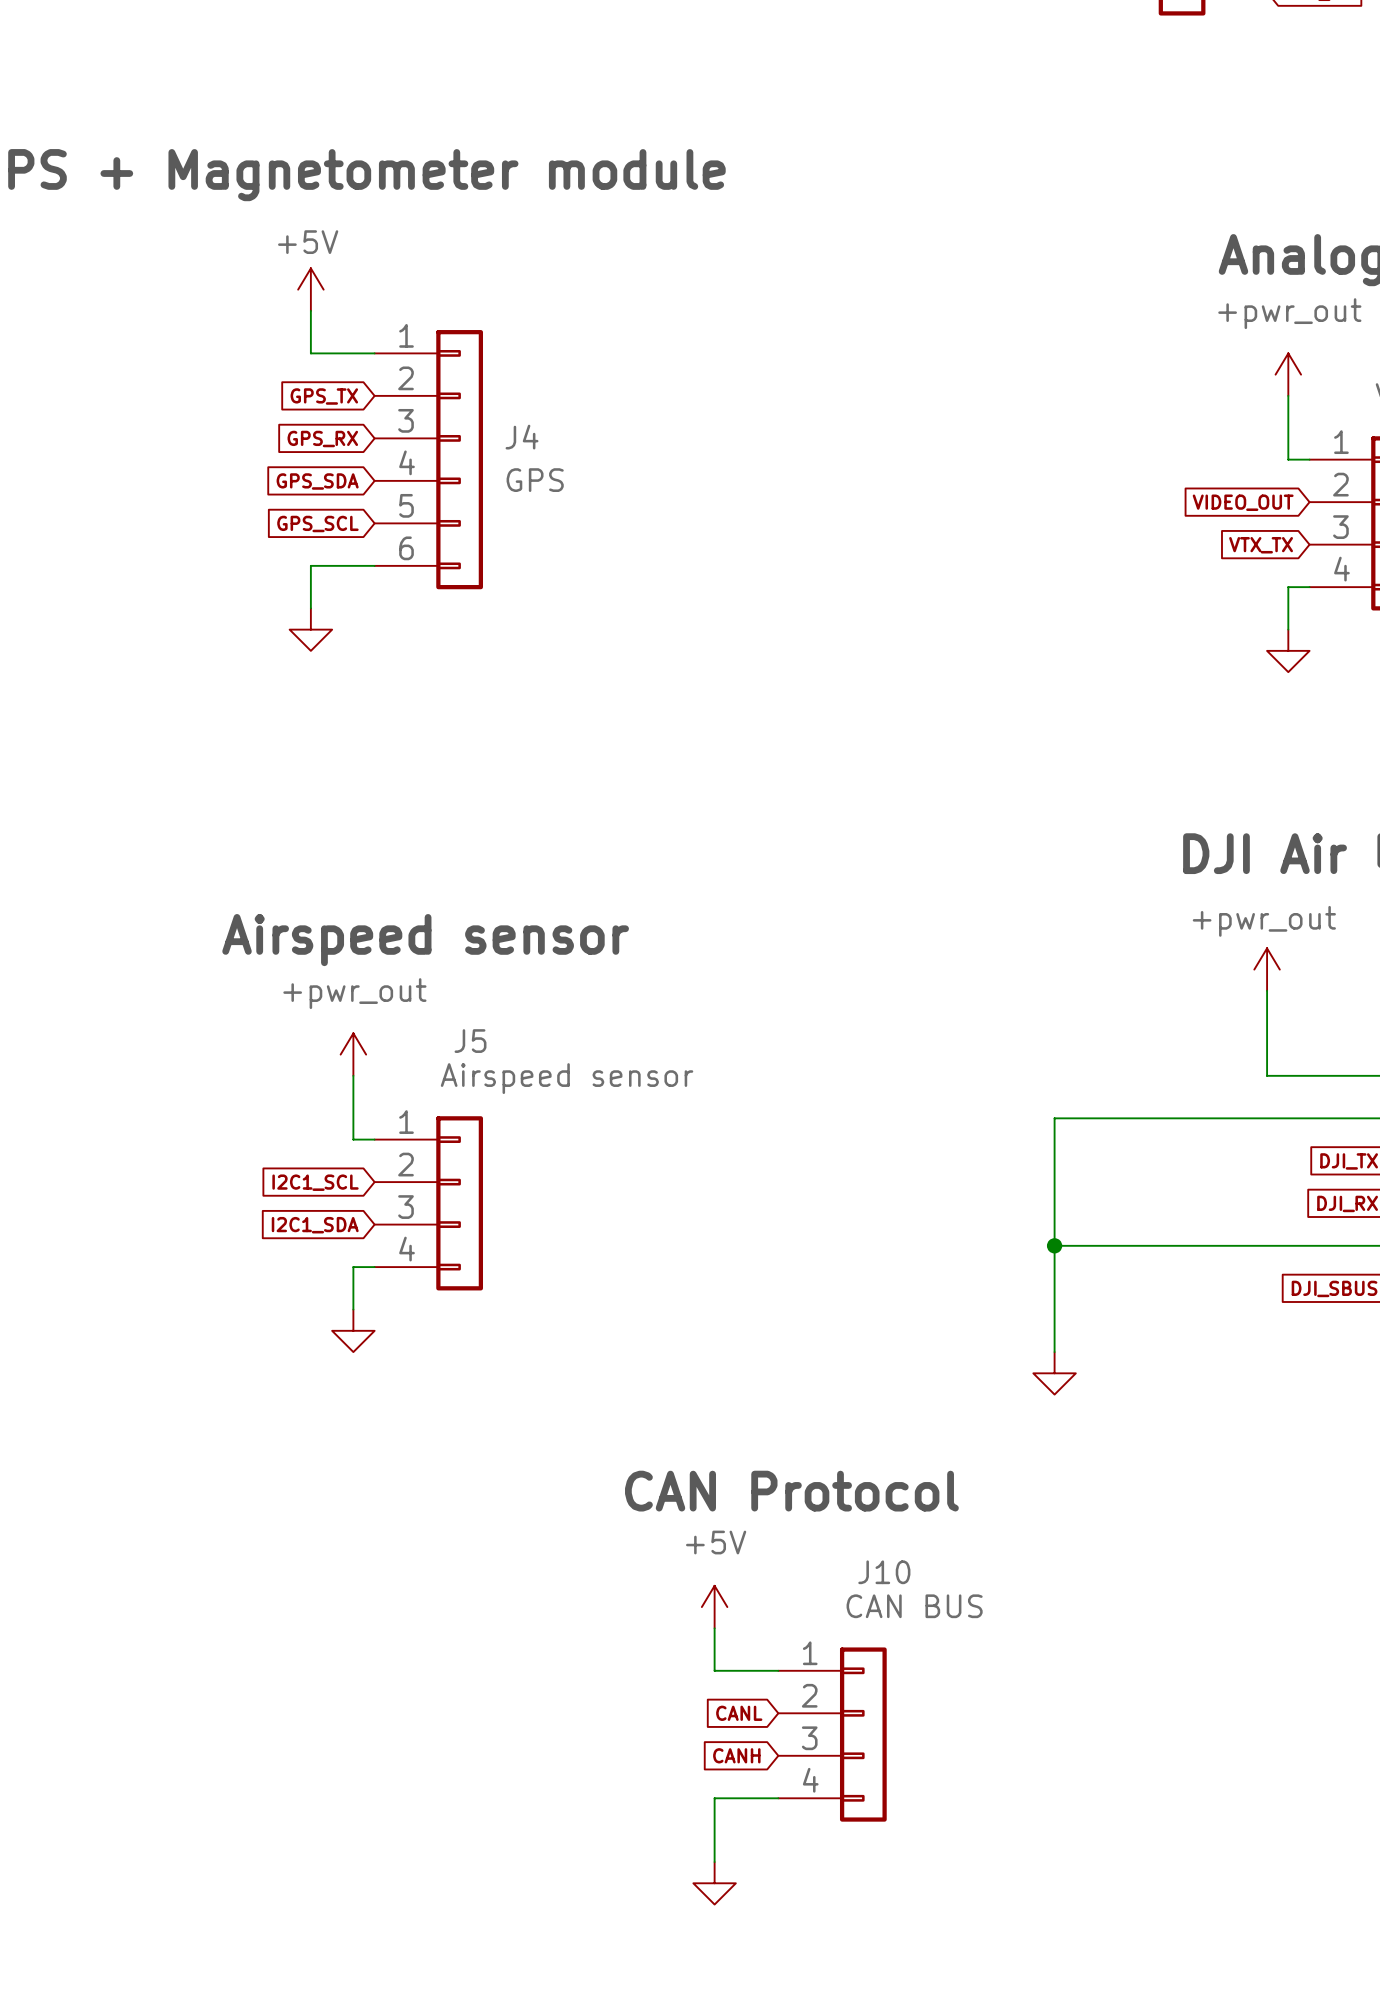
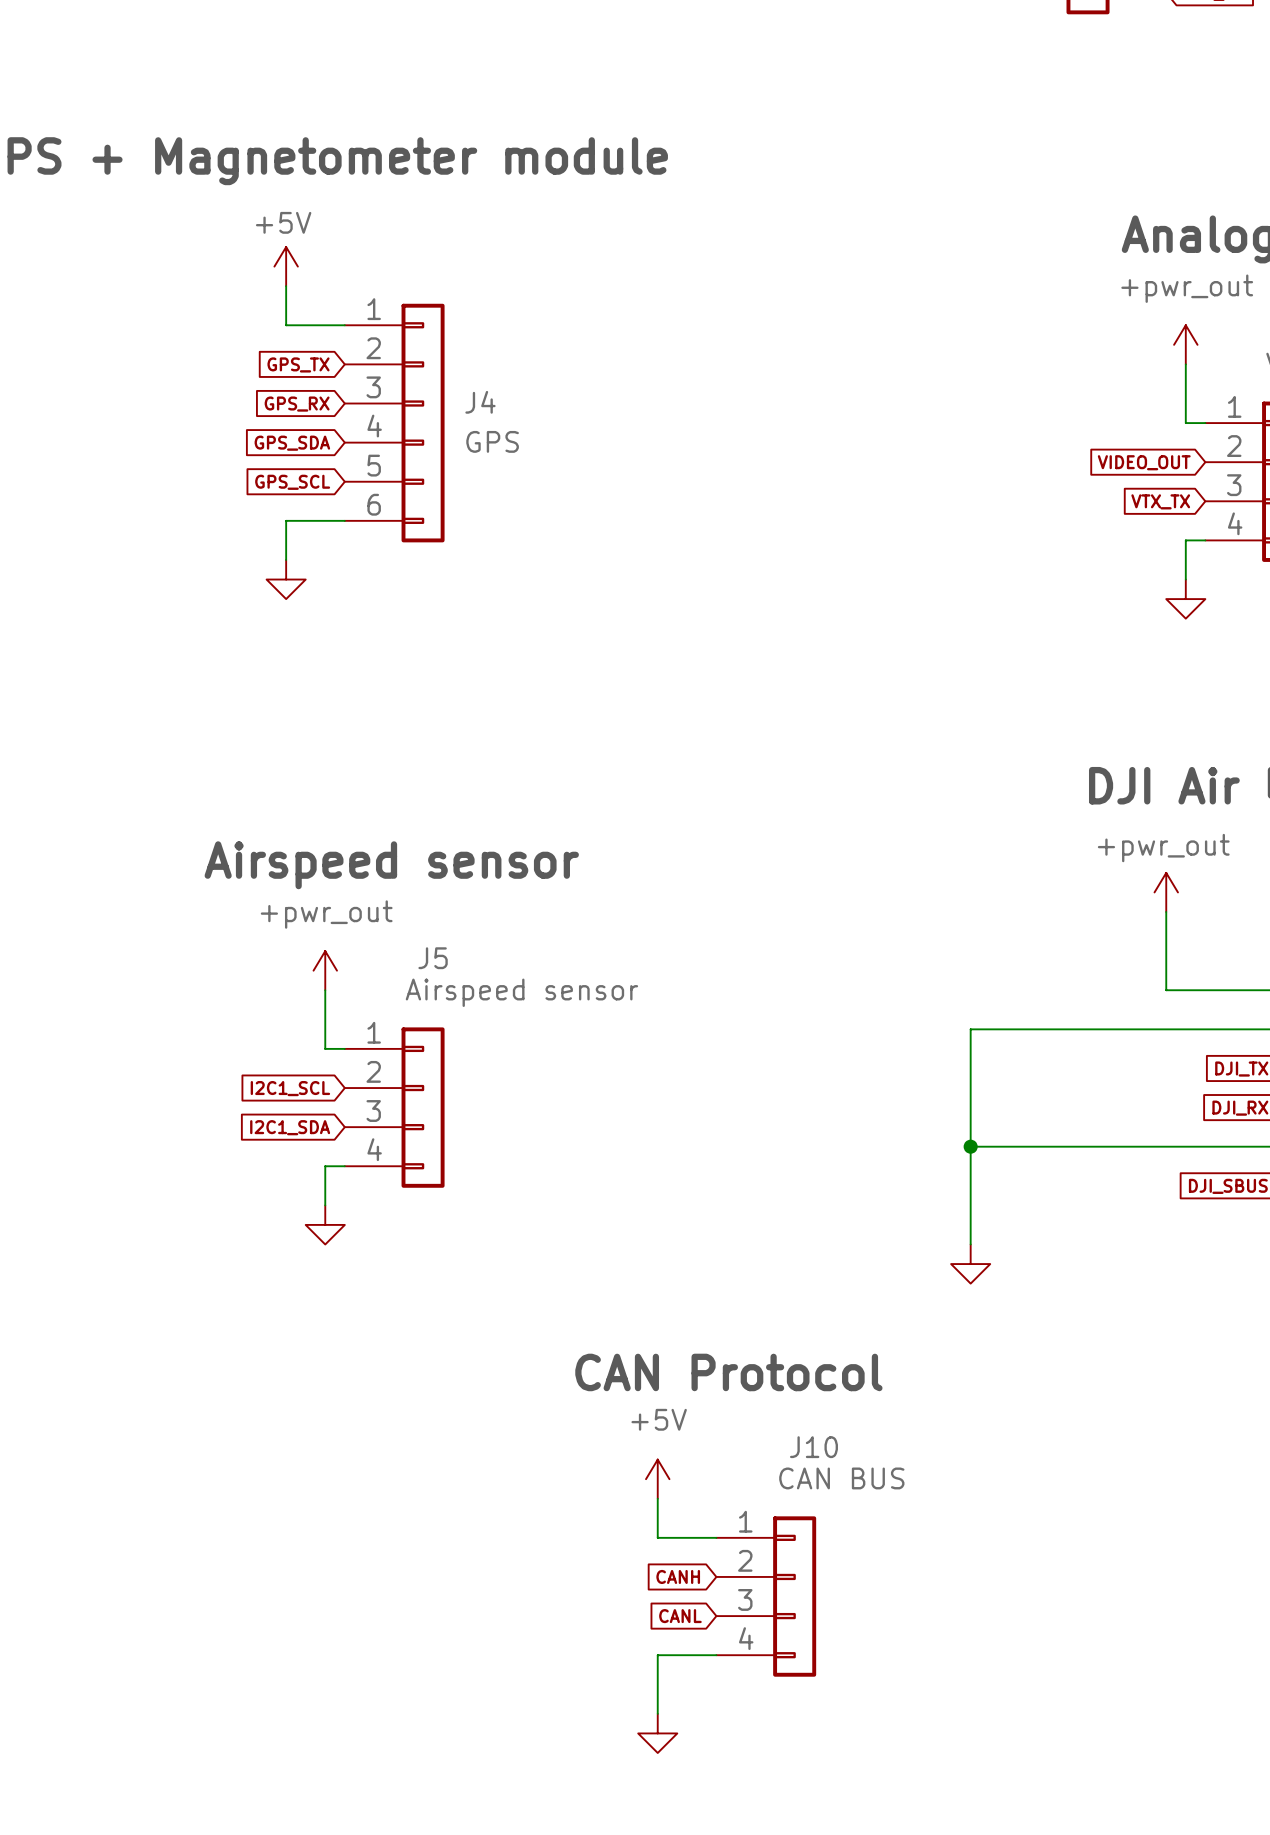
global label: CANL (739, 1713) -> CANH (678, 1576)
global label: CANH (736, 1755) -> CANL (680, 1616)

